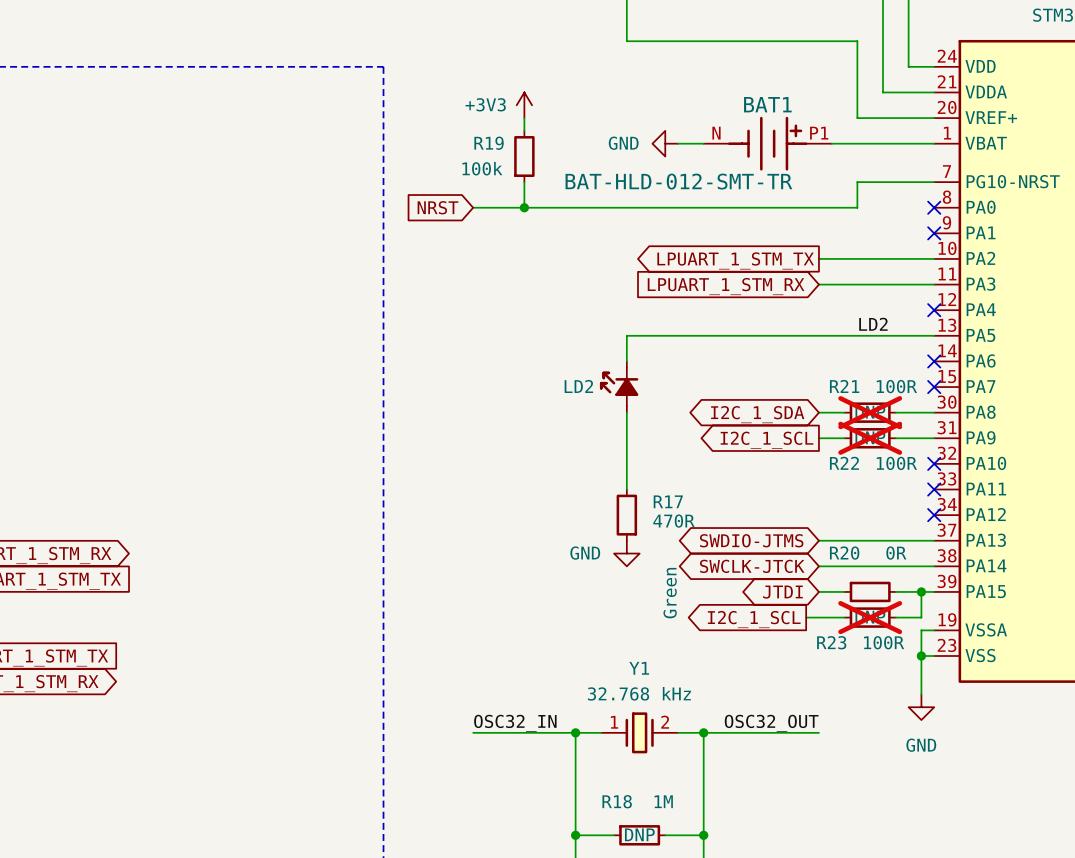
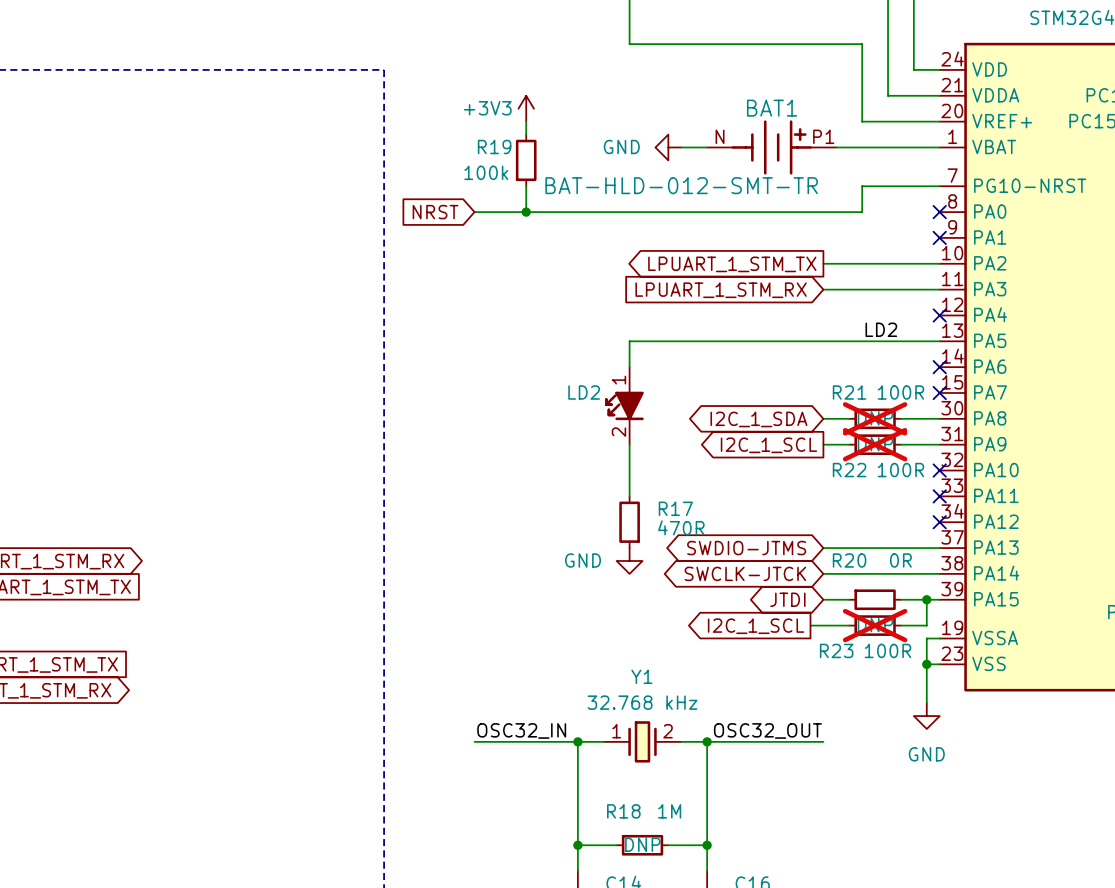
LD2 symbol: [599, 361, 639, 413] -> [605, 367, 644, 445]
LD2 text: Green (670, 593) -> none

